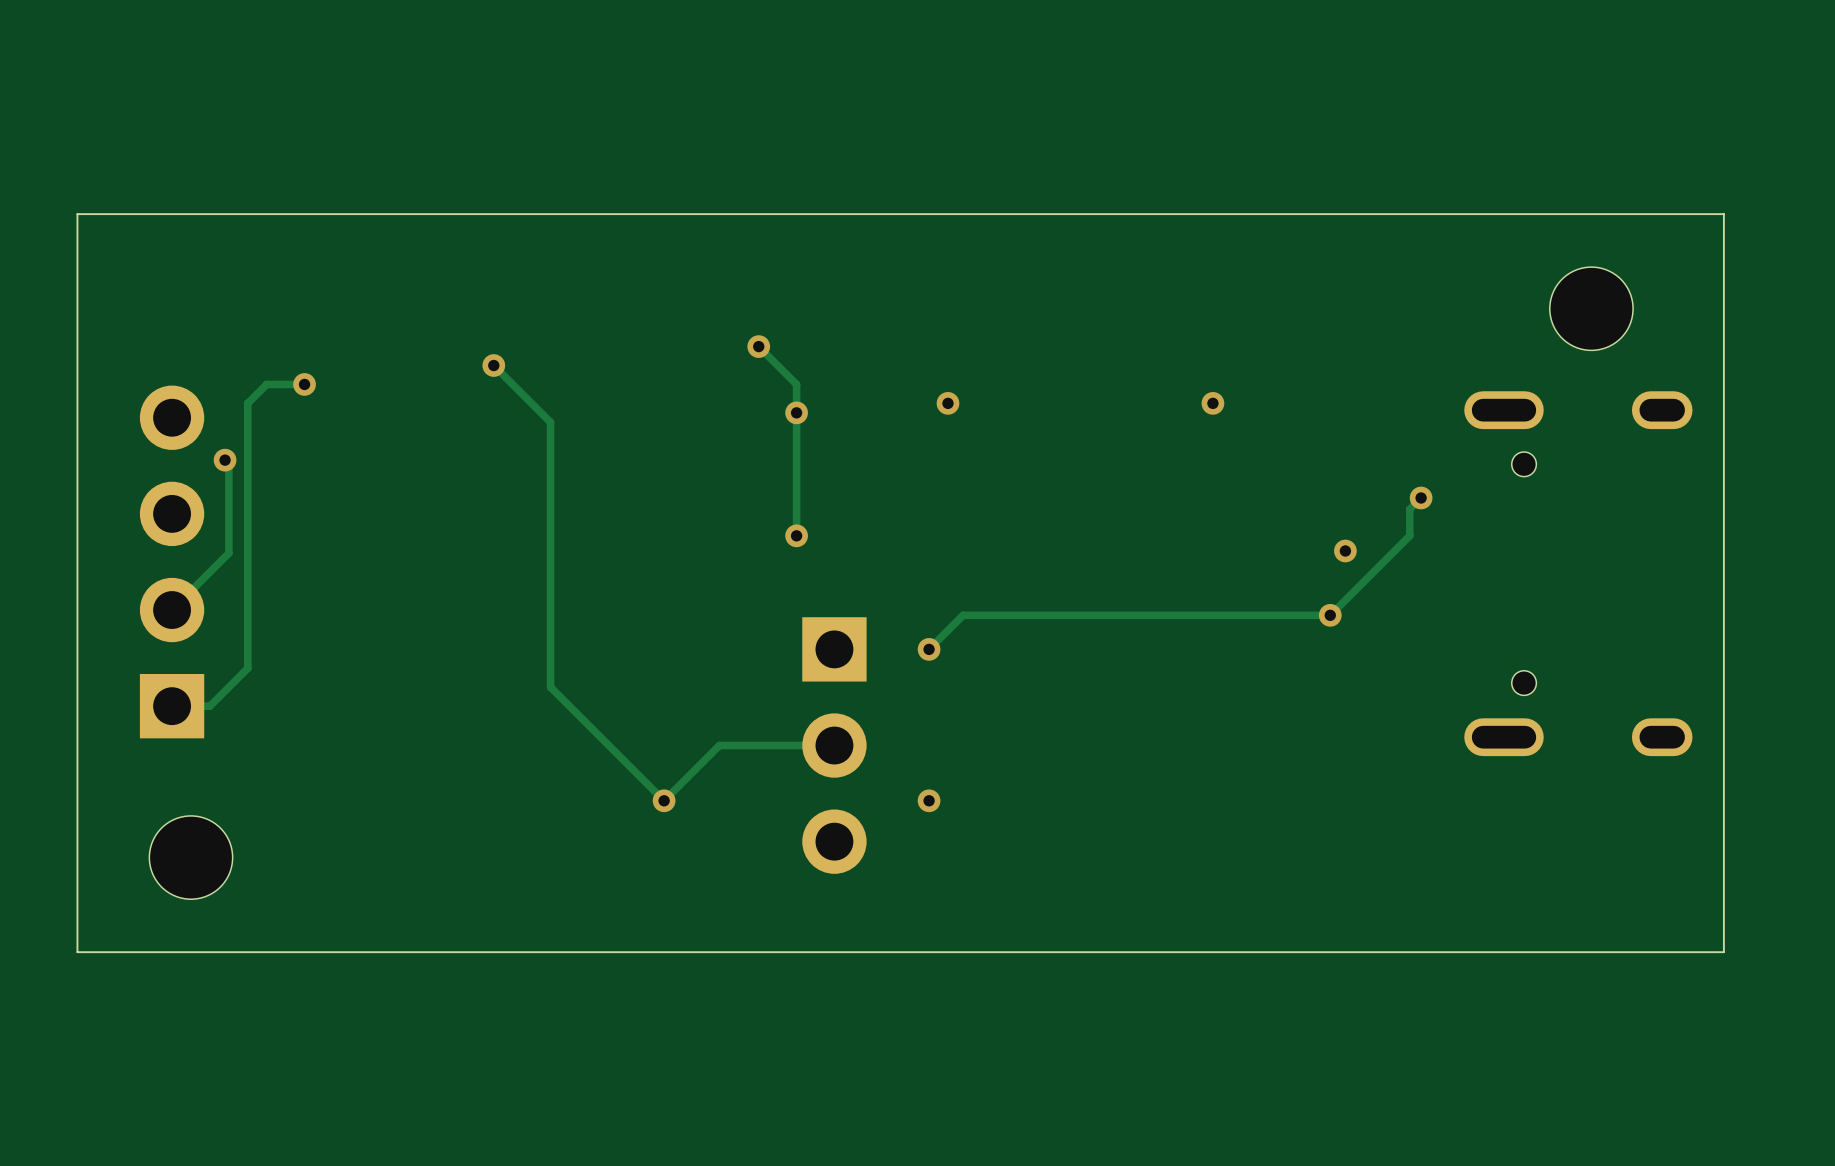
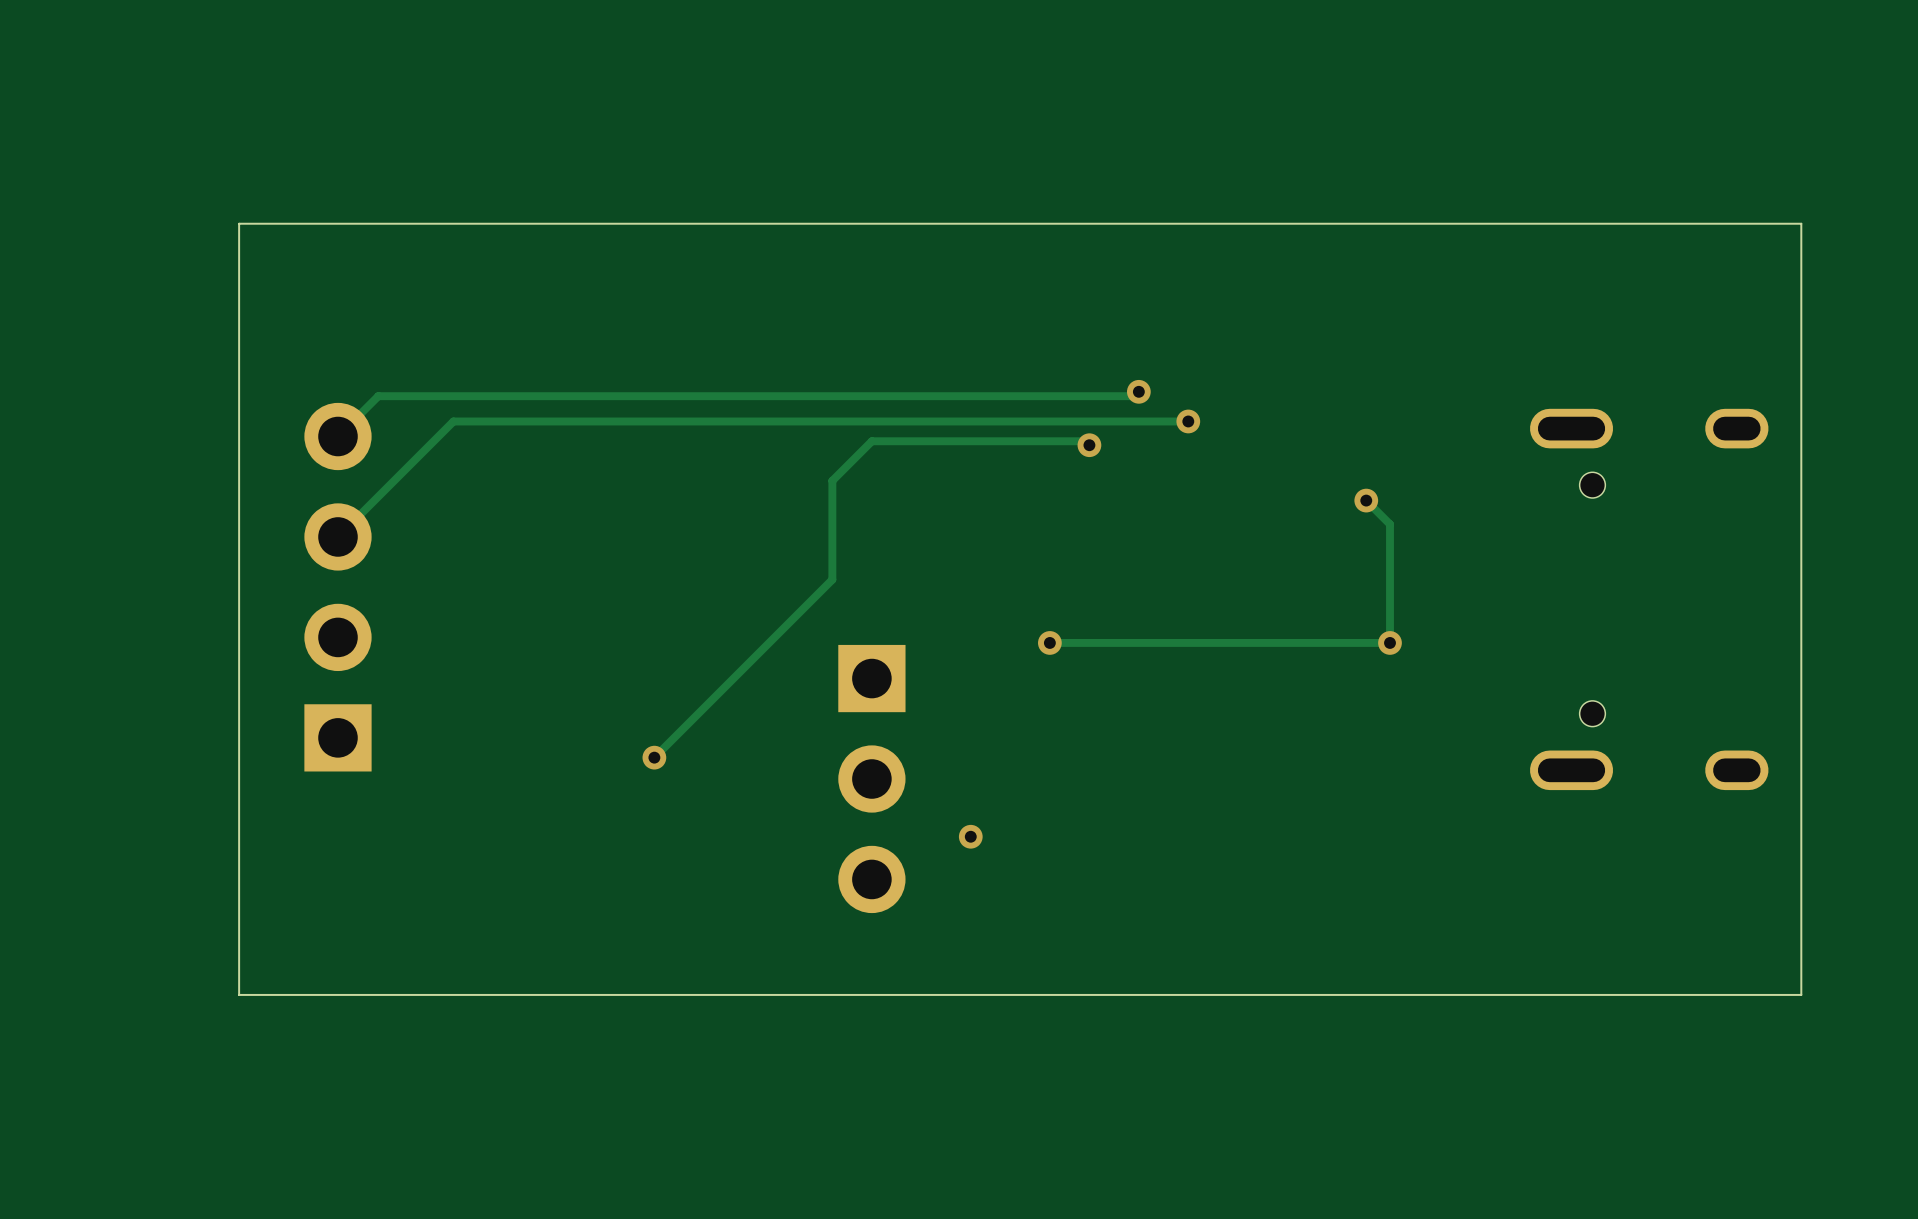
board edge: (228, 214) (77, 214) (77, 952) (228, 952) -> (239, 223) (239, 994)
part: (1591, 308) -> none
track: (758, 346) (796, 384) (796, 460) -> (1089, 445) (1089, 441) (871, 441) (832, 480)
via: (758, 346) -> none
track: (493, 365) (550, 422) (550, 687) (664, 800) (719, 745) (834, 745) -> none
via: (493, 365) -> none
track: none -> (1138, 391) (1134, 396) (378, 396) (337, 436)
via: none -> (1138, 391)
track: (304, 384) (266, 384) (247, 403) (247, 668) (209, 706) (172, 706) -> none
via: (304, 384) -> none
via: (947, 403) -> none
track: none -> (1188, 421) (453, 421) (337, 536)
via: none -> (1188, 421)
via: (1212, 403) -> none
via: (796, 412) -> none
via: none -> (1089, 445)
track: (225, 460) (228, 460) (228, 553) (172, 610) -> none
via: (225, 460) -> none
via: none -> (1366, 500)
track: (1421, 497) (1409, 509) (1409, 535) (1330, 615) -> (1366, 500) (1390, 524) (1390, 642)
via: (1421, 497) -> none
track: none -> (832, 559) (832, 579) (654, 757)
via: (796, 535) -> none
via: (1345, 550) -> none
part position: (172, 561) -> (337, 587)
track: (1004, 615) (963, 615) (929, 649) -> none
via position: (929, 649) -> (1049, 642)
via position: (664, 800) -> (654, 757)
part: (190, 857) -> none

